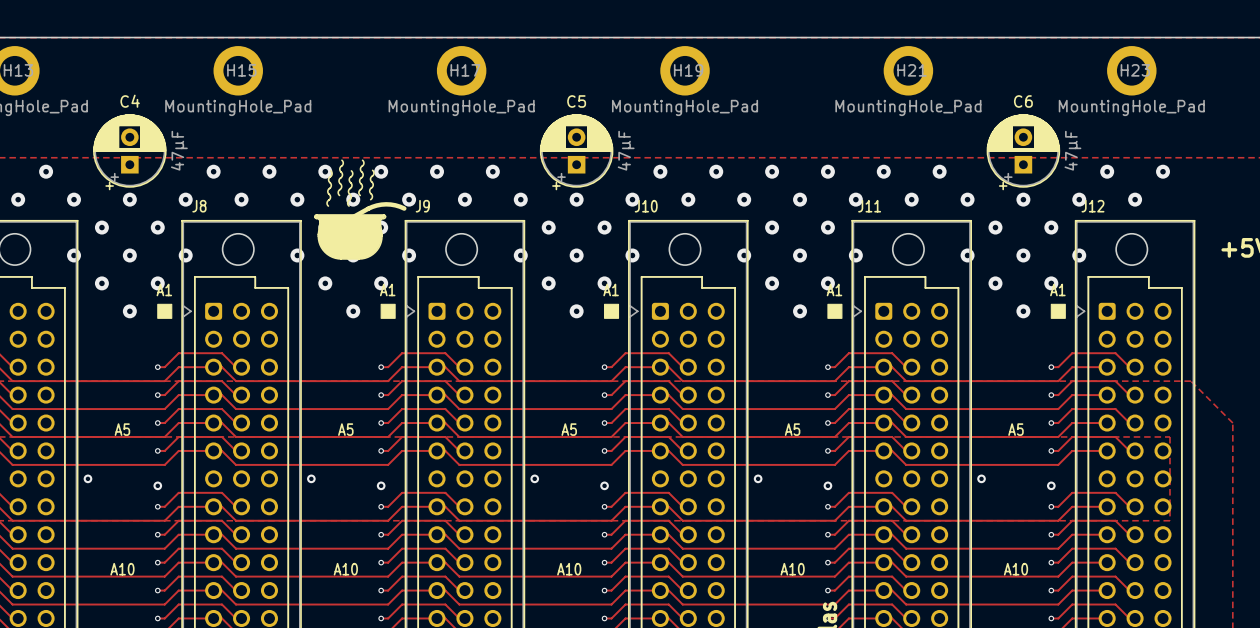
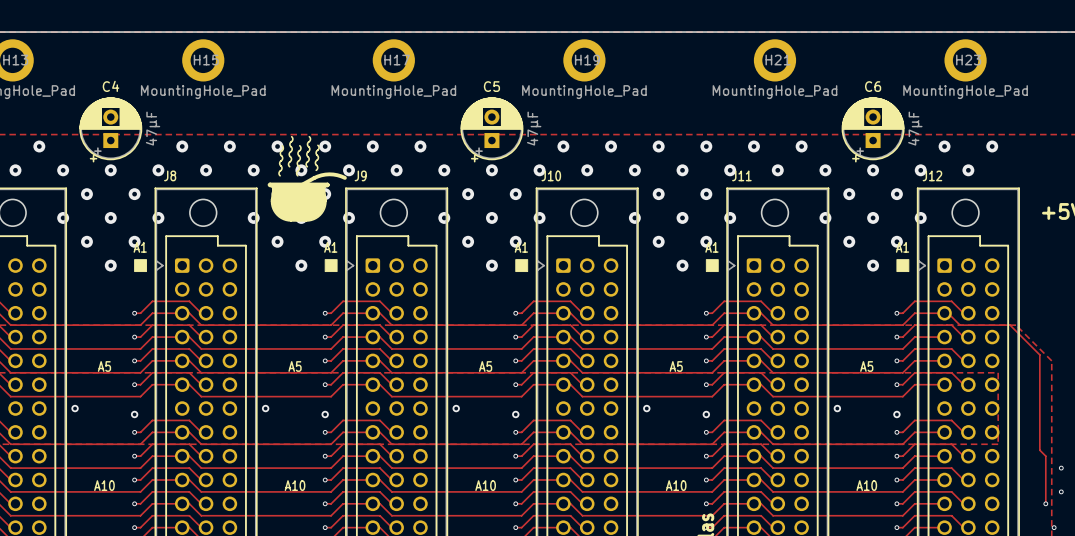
track: none -> (944, 313) (948, 313) (960, 325) (1010, 325) (1039, 354) (1039, 450) (1045, 456) (1045, 503)
via: none -> (1061, 468)
via: none -> (1061, 491)
via: none -> (1045, 503)
via: none -> (1054, 527)

